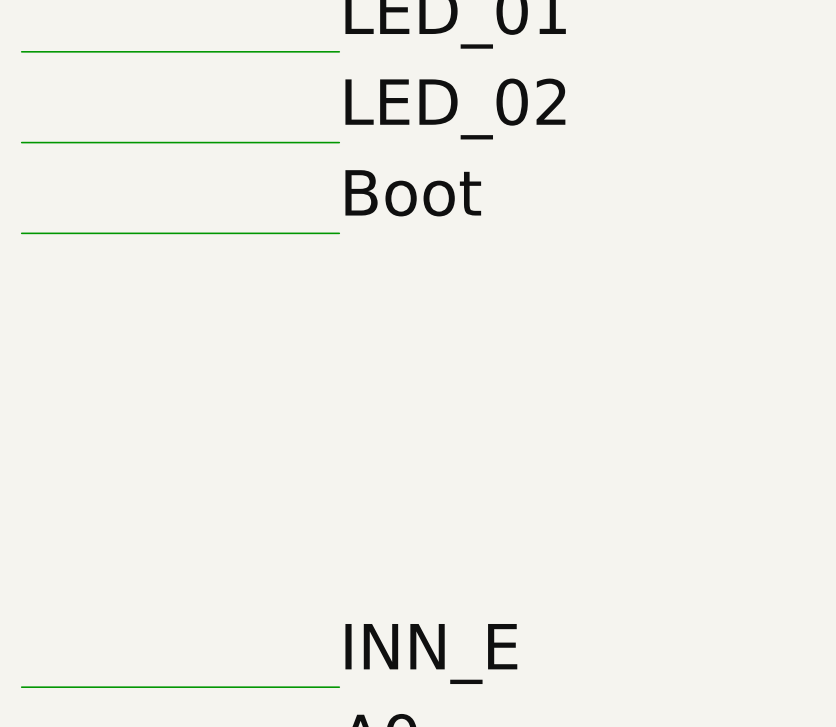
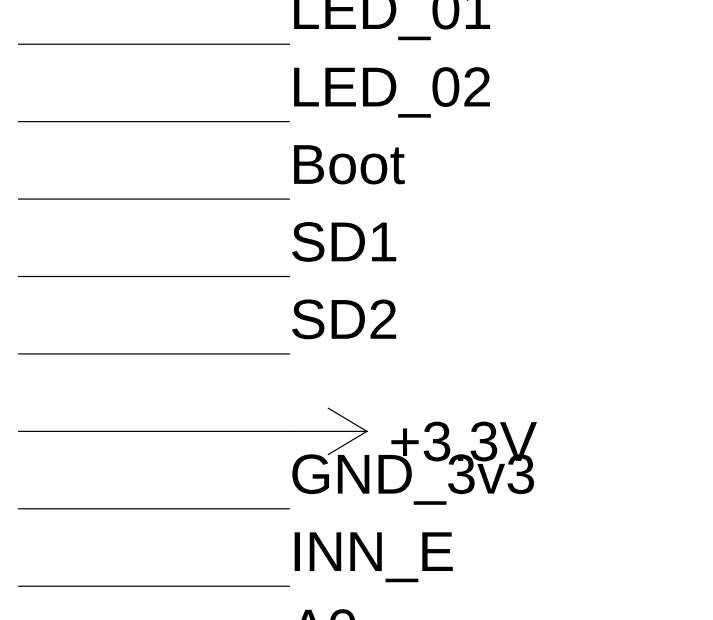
label: none -> SD1 (344, 241)
wire: none -> (18, 276) (289, 276)
label: none -> SD2 (344, 319)
wire: none -> (18, 353) (289, 353)
wire: none -> (18, 431) (289, 431)
power symbol: none -> +3.3V (328, 431)
label: none -> GND_3v3 (413, 479)
wire: none -> (18, 508) (289, 508)

